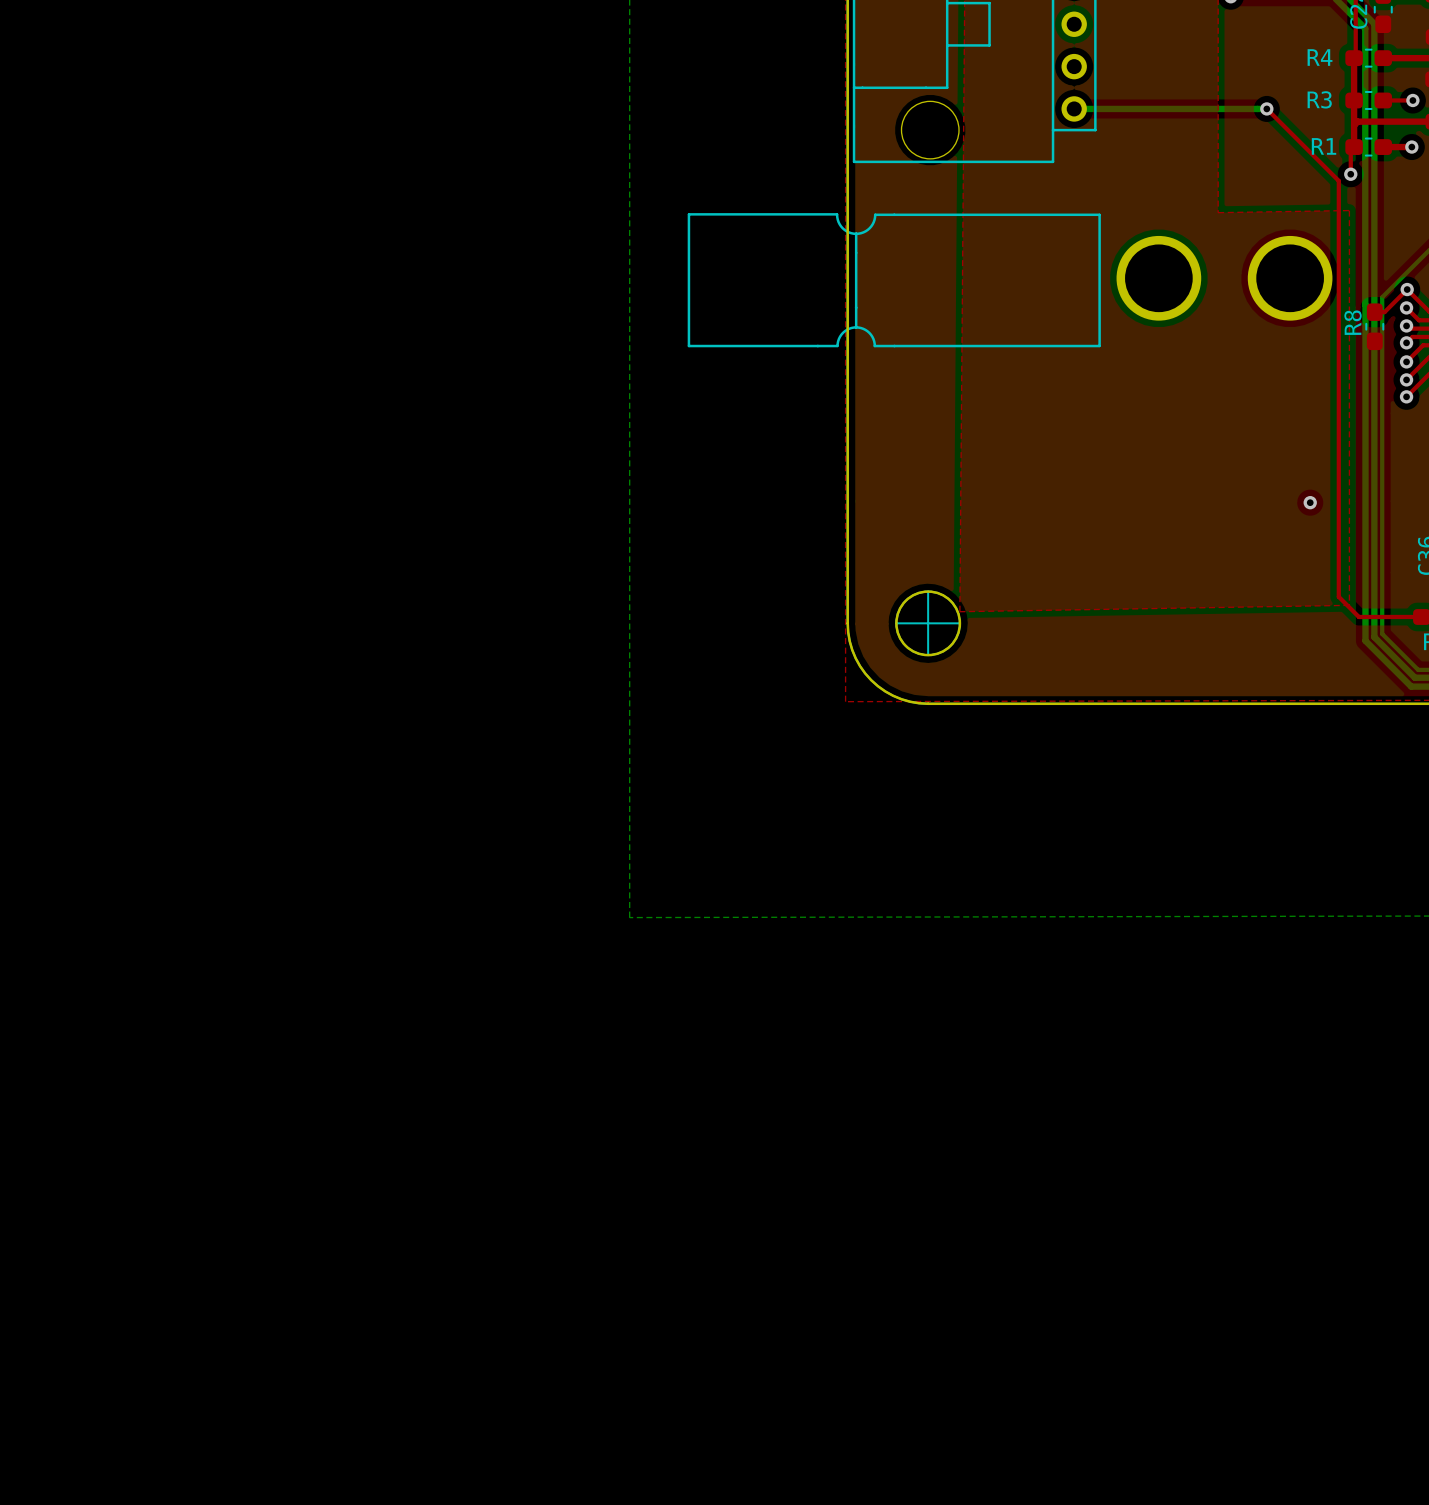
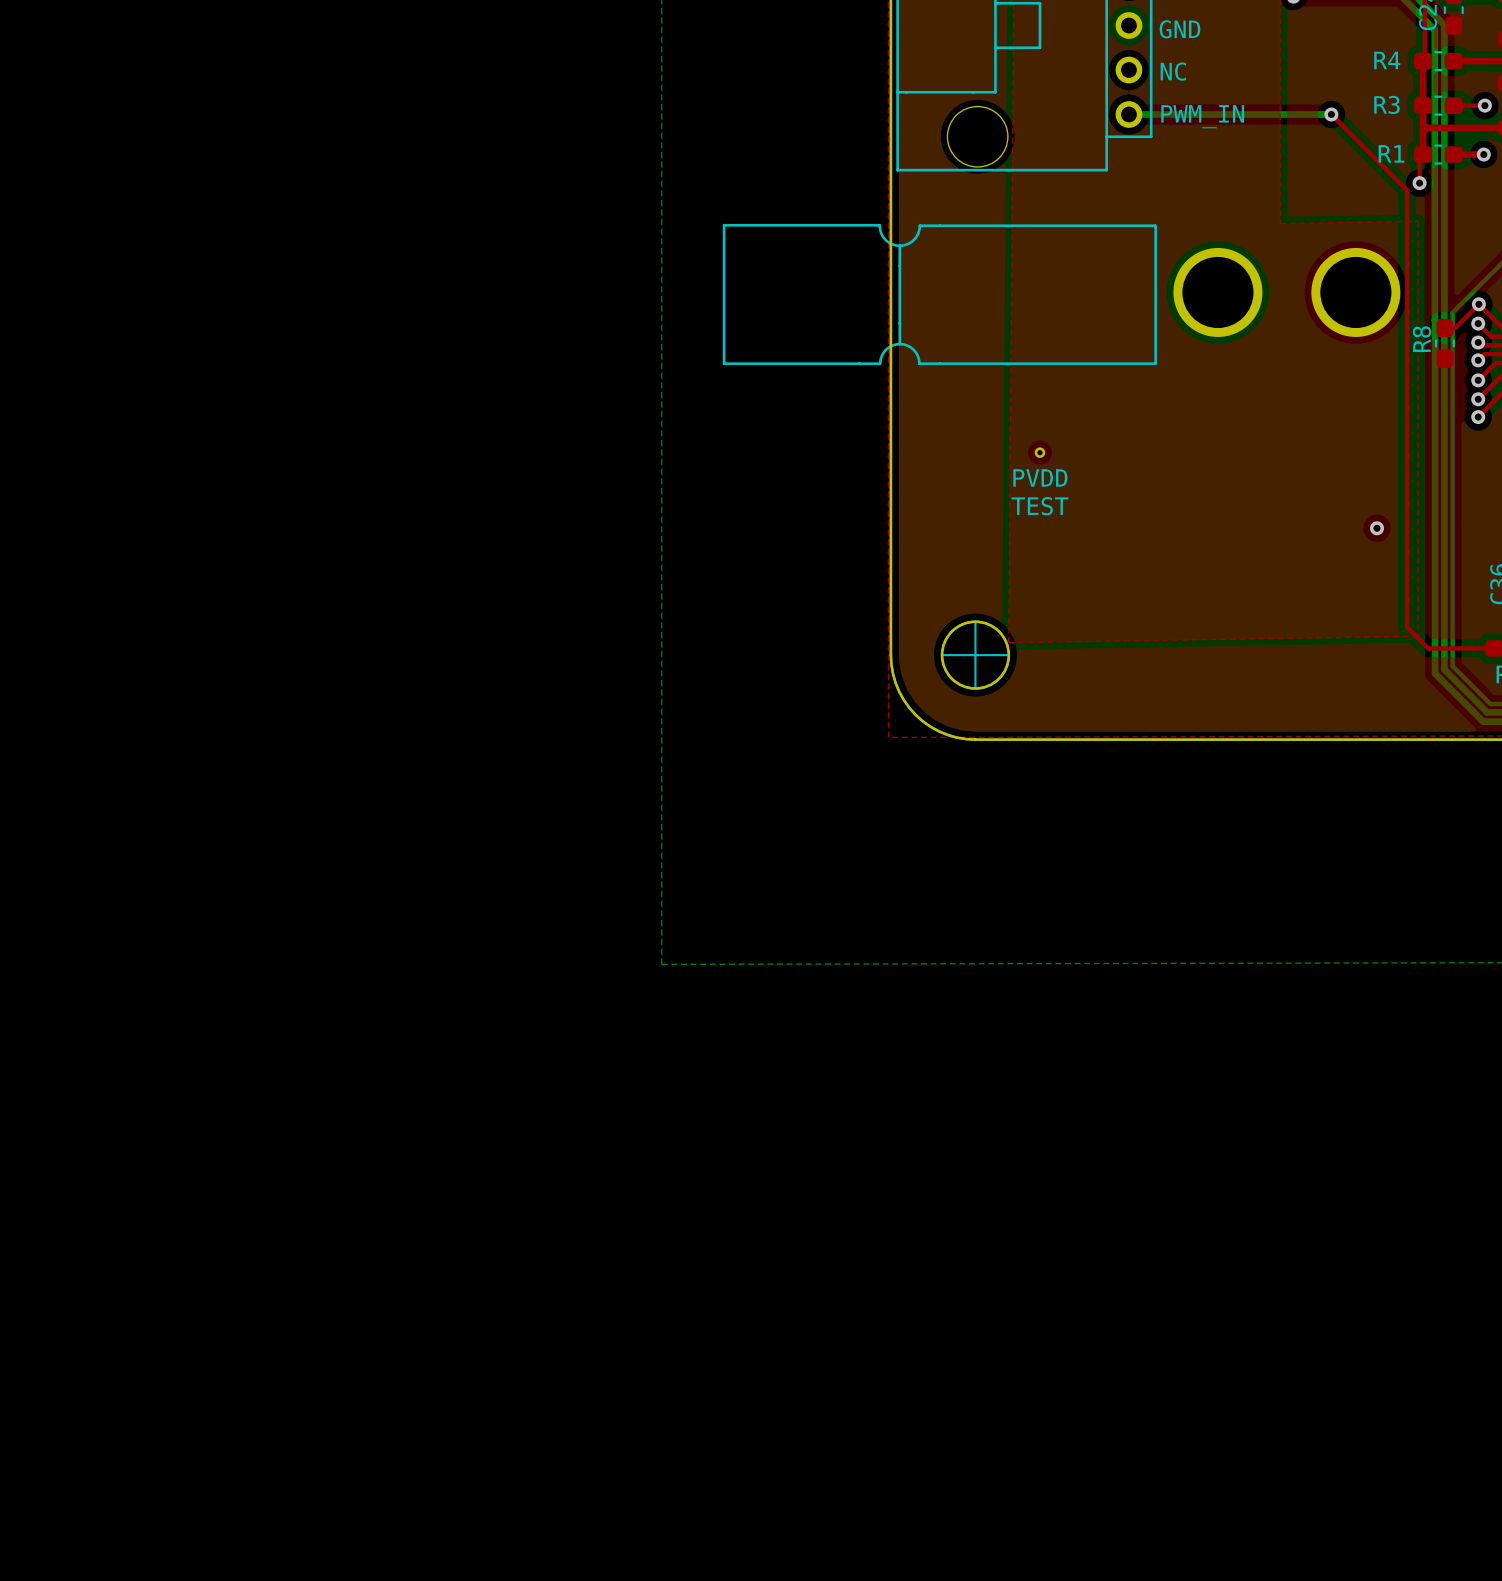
text: none -> GND (1179, 29)
text: none -> NC (1173, 71)
text: none -> PWM_IN (1202, 116)
part: none -> (1039, 452)
text: none -> PVDD (1040, 477)
text: none -> TEST (1039, 506)

